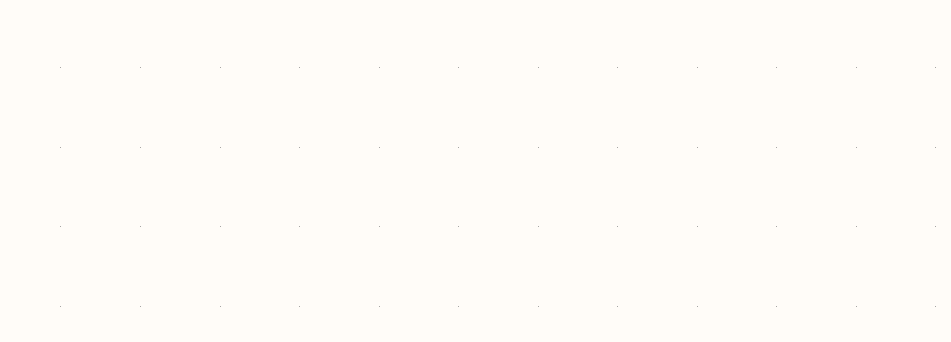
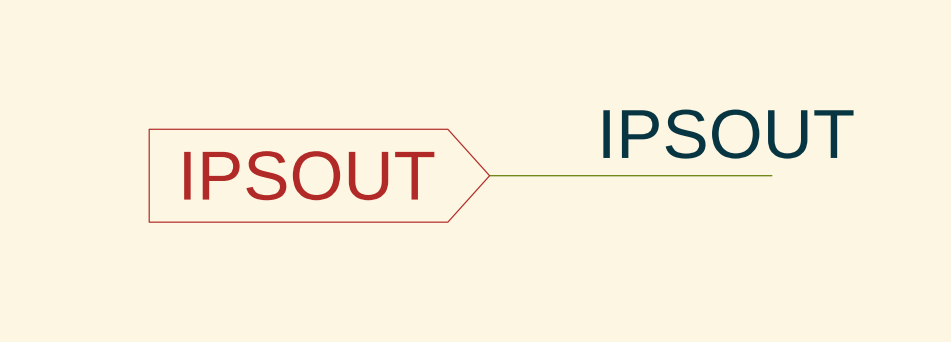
label: none -> IPSOUT (728, 134)
global label: none -> IPSOUT (309, 175)
wire: none -> (489, 175) (771, 175)

